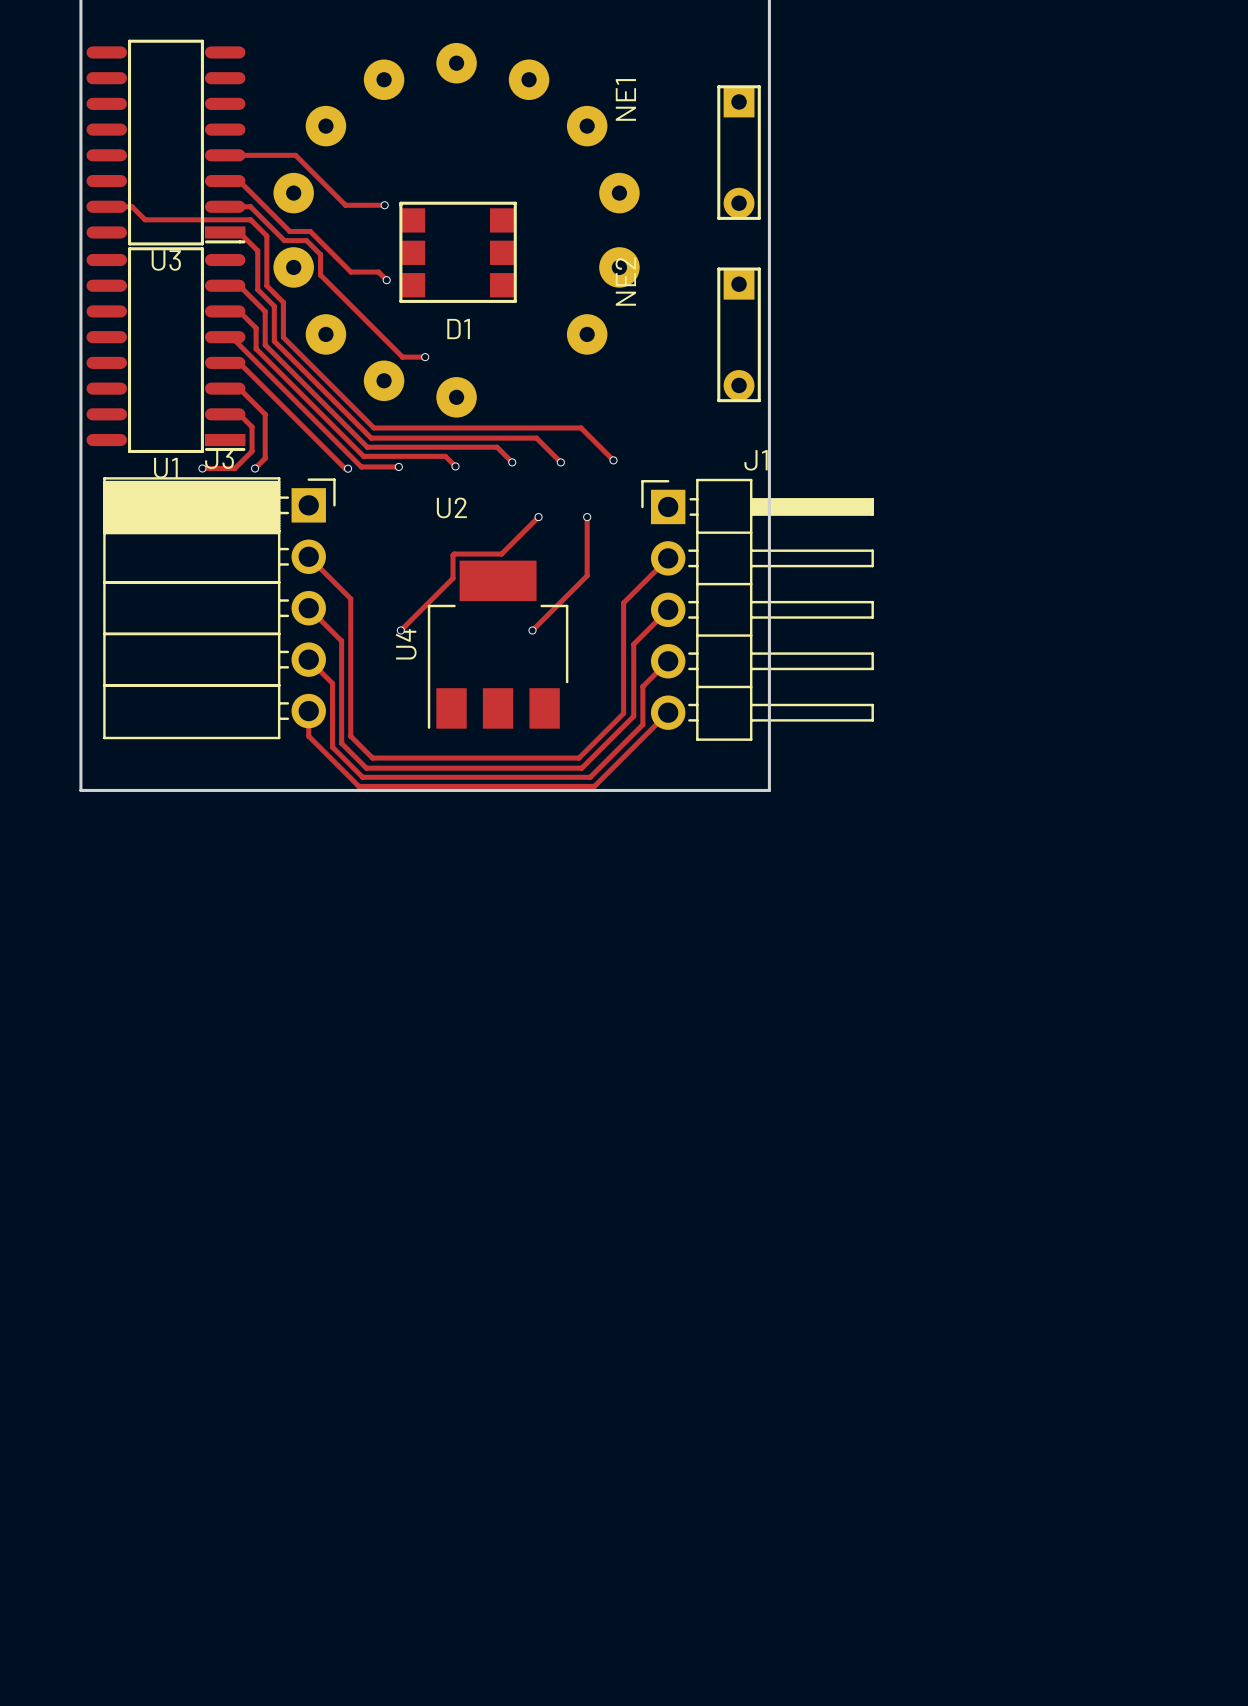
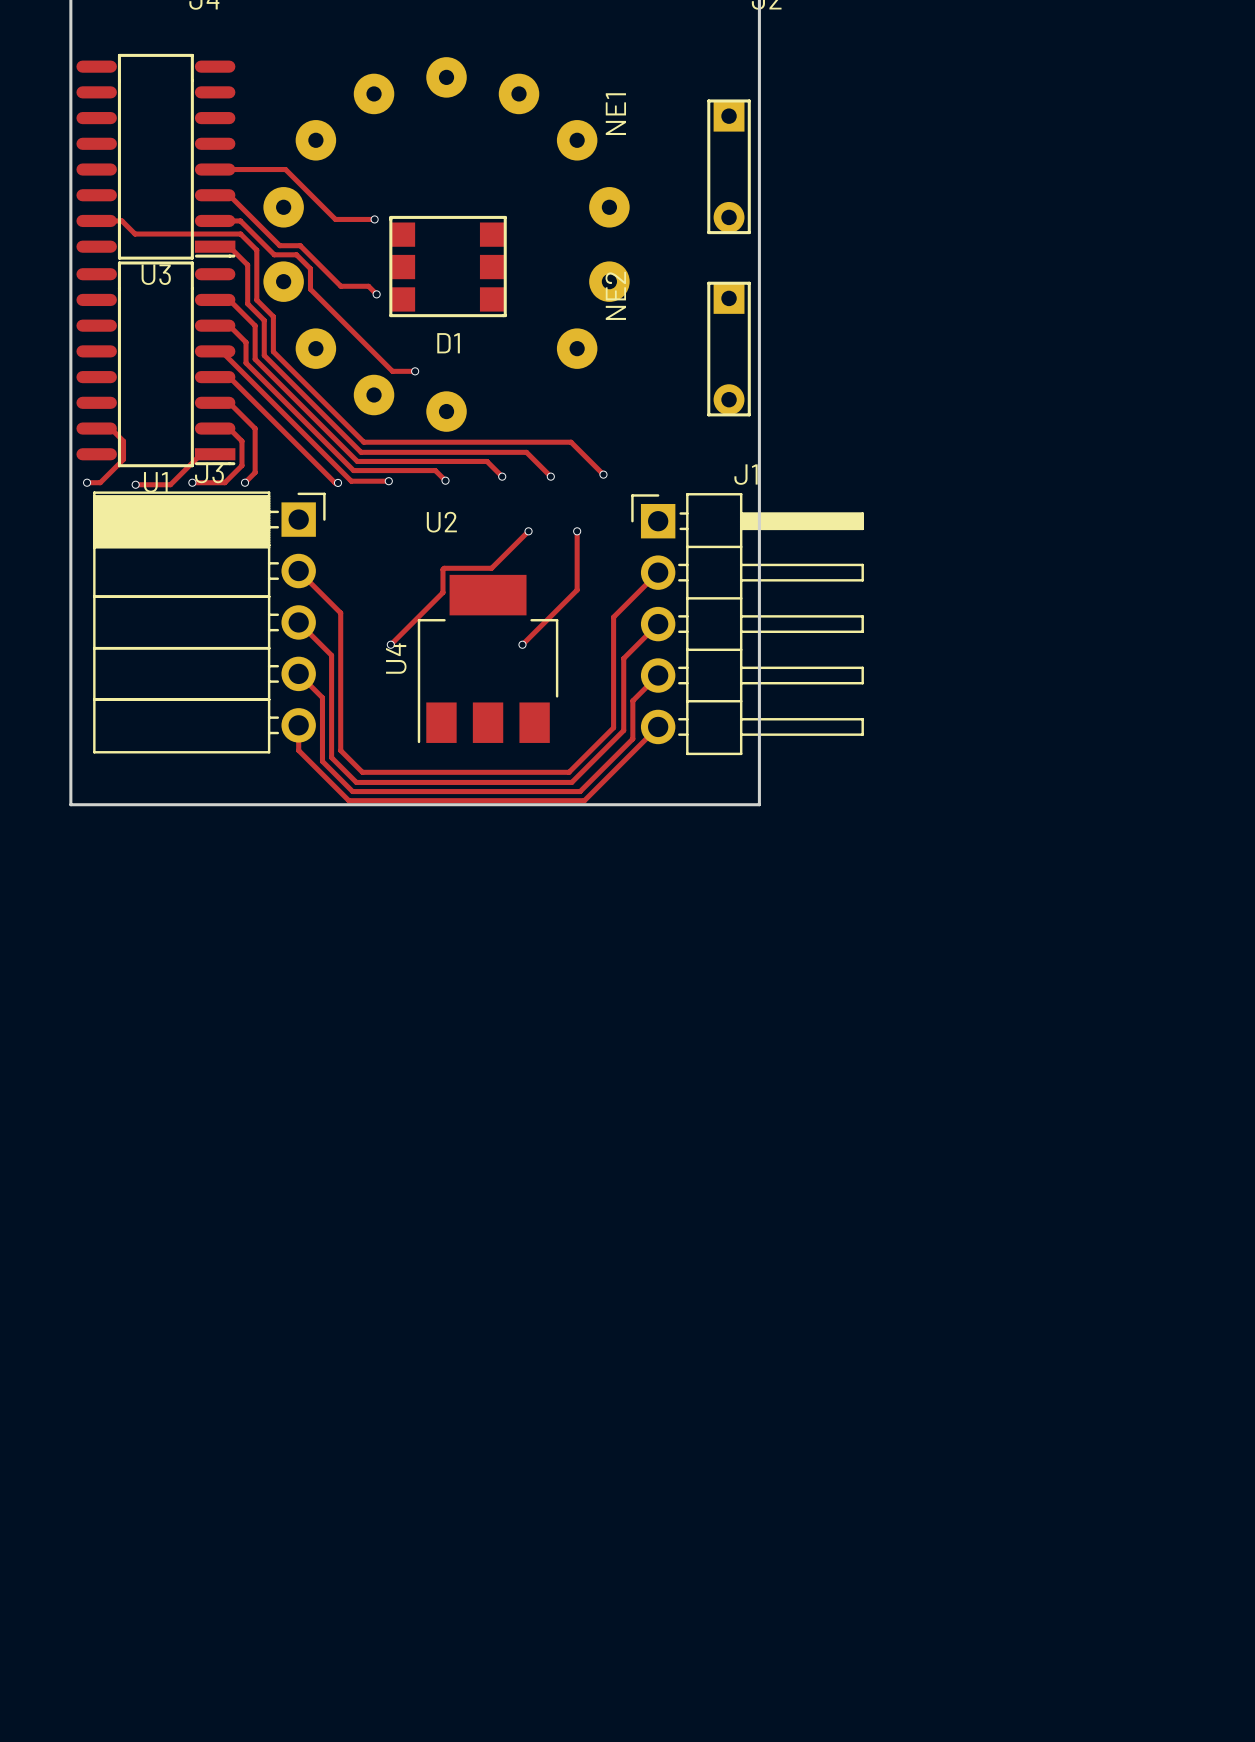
track: none -> (110, 428) (123, 441) (123, 459) (100, 482) (87, 482)
track: none -> (200, 454) (170, 484) (135, 484)
via: none -> (87, 482)
via: none -> (135, 484)

